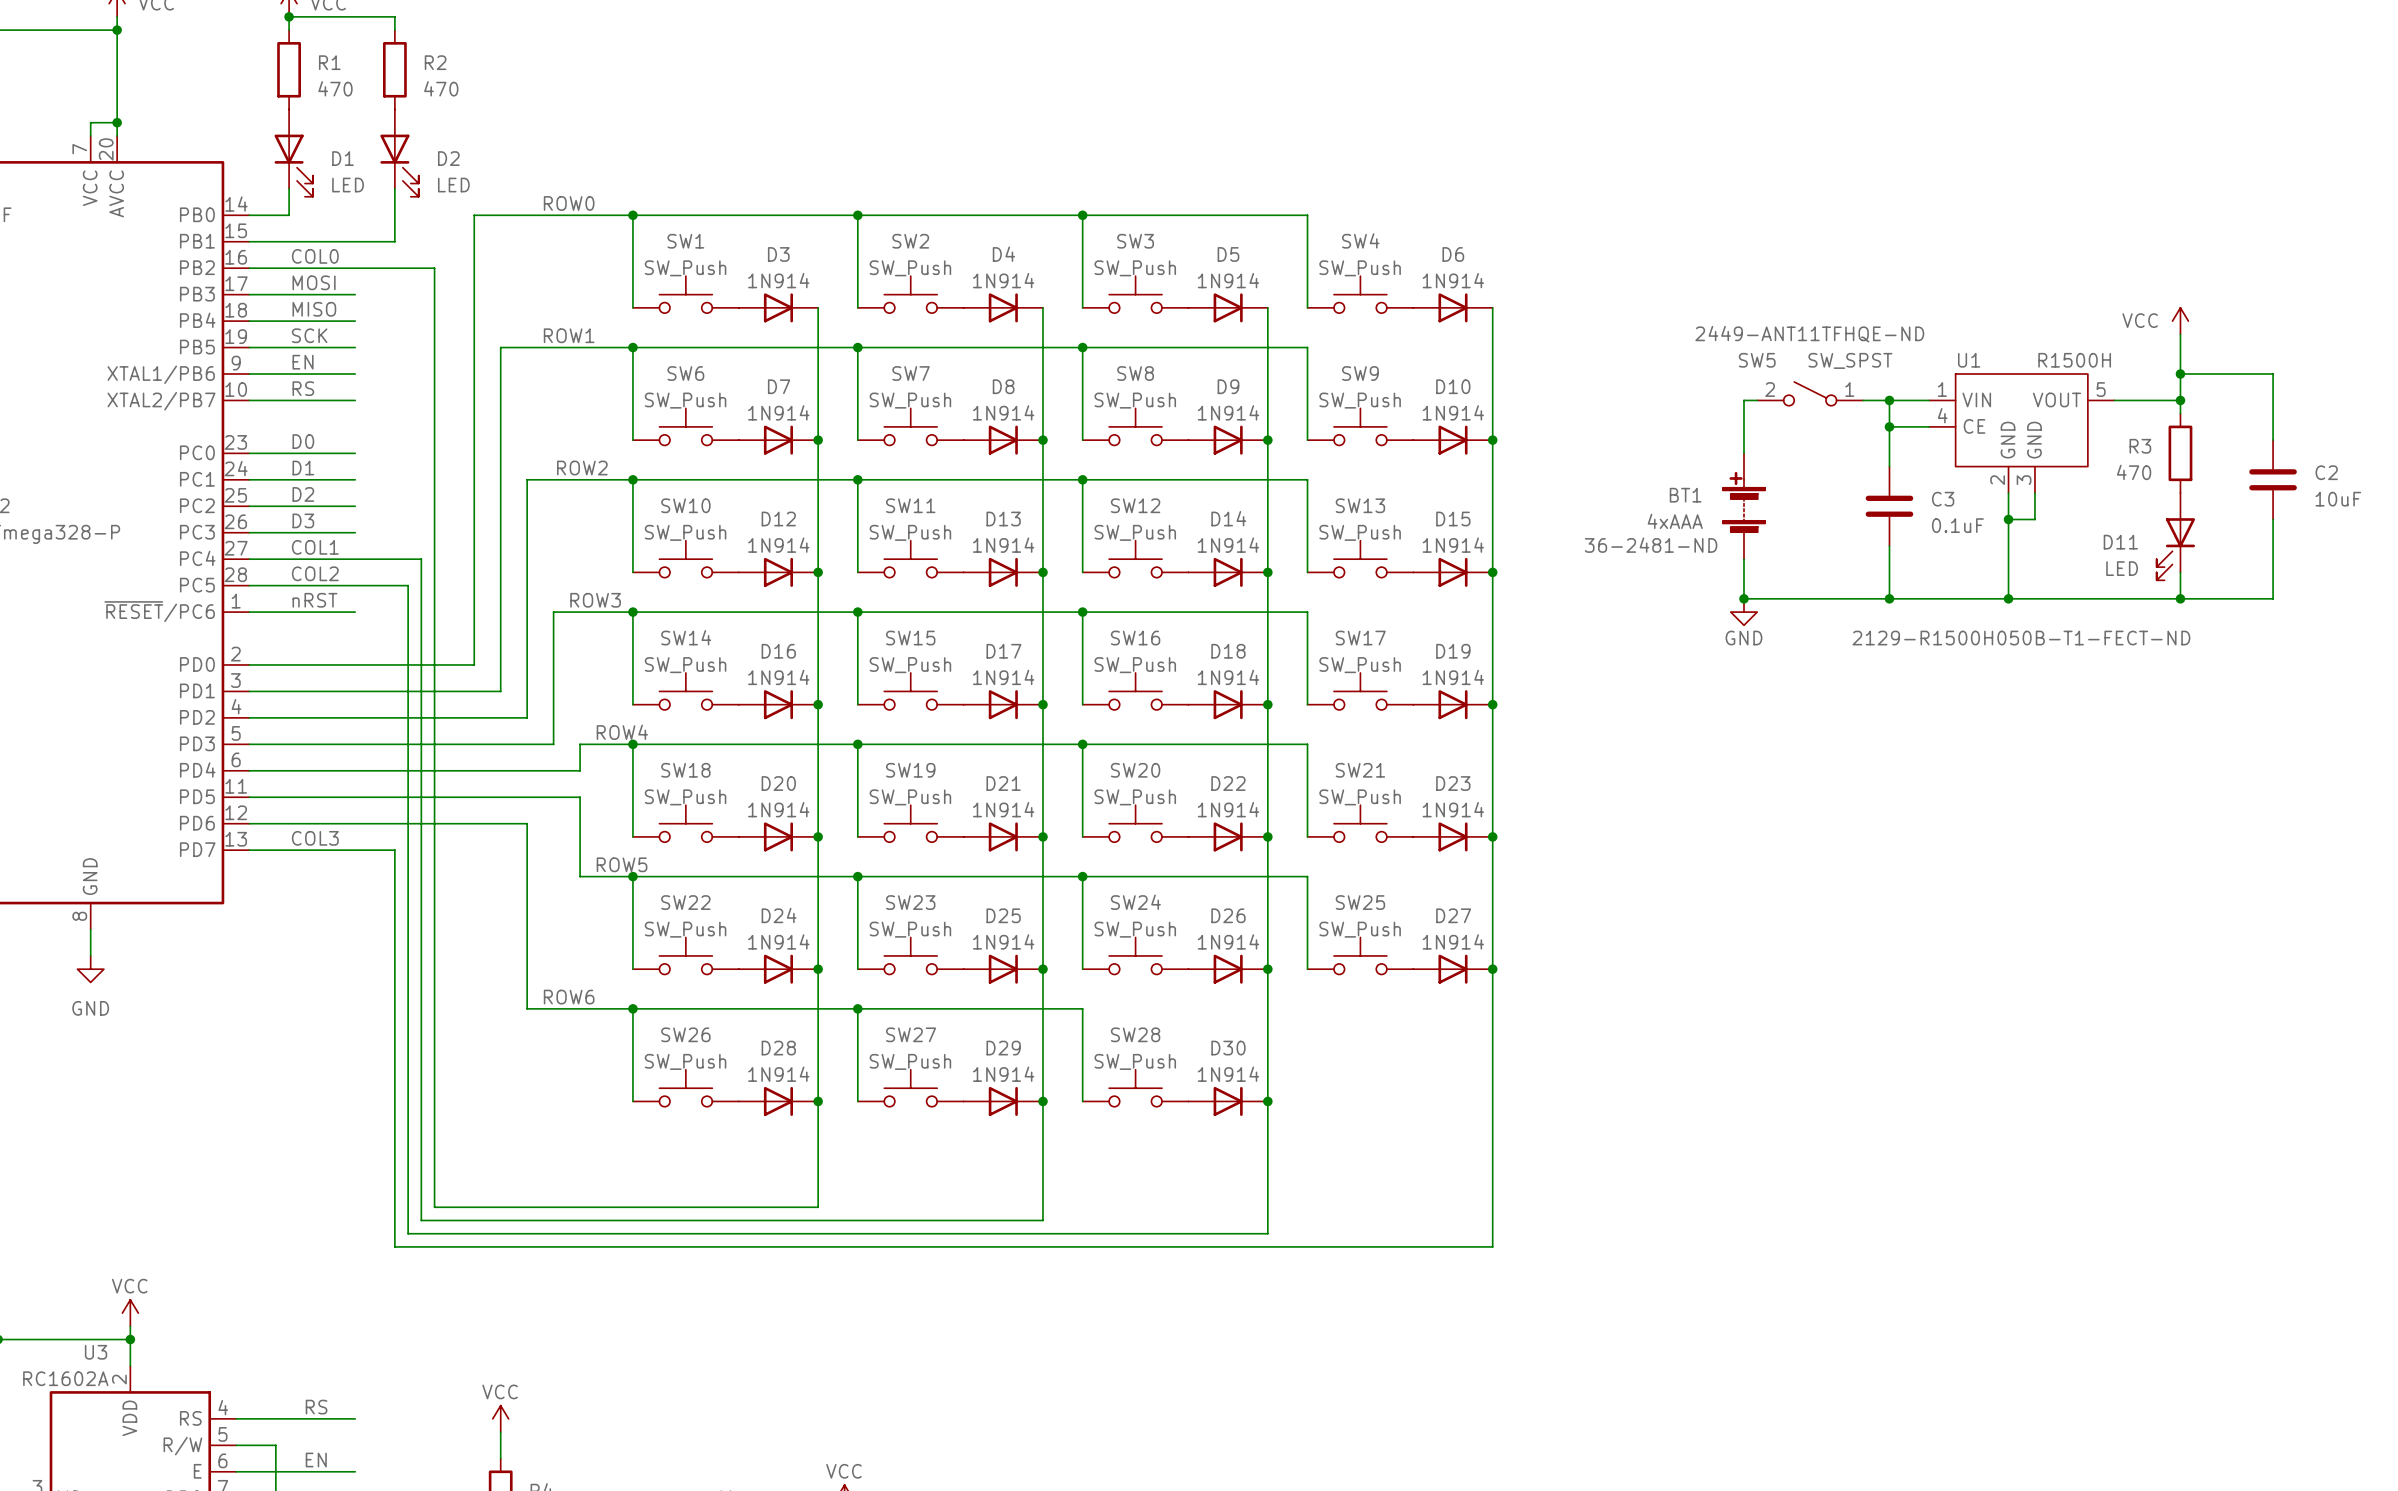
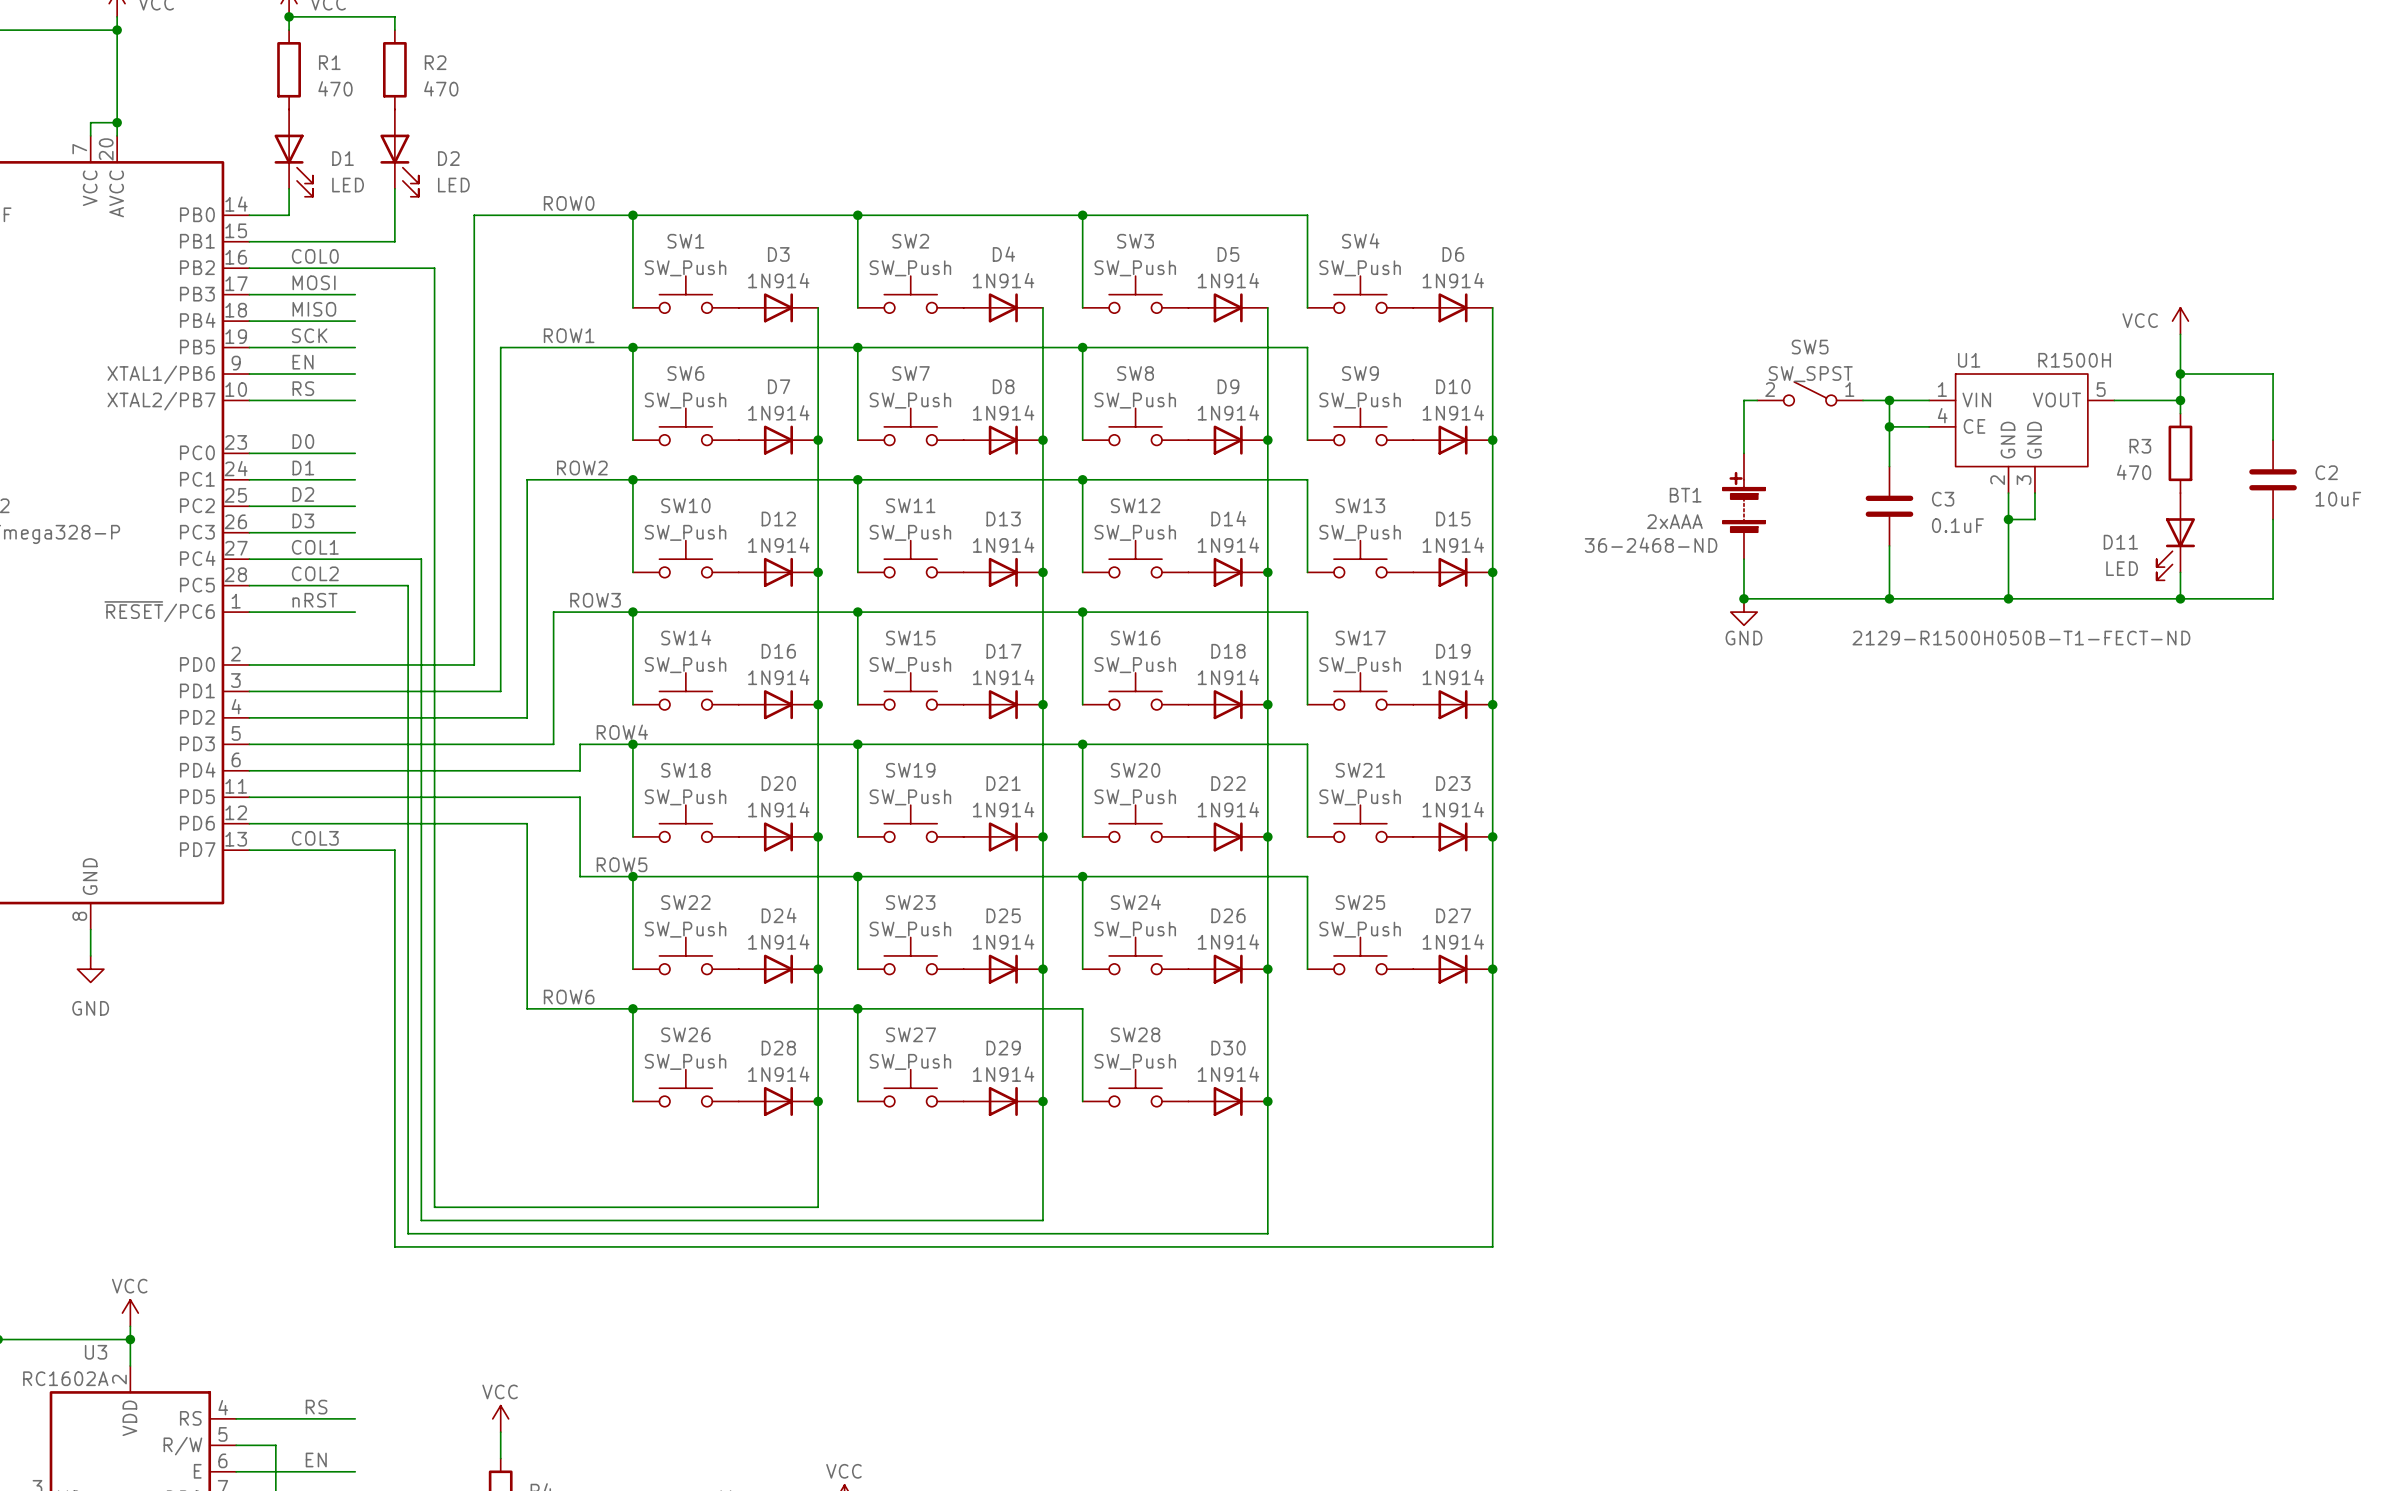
SW5 text: 2449-ANT11TFHQE-ND (1809, 334) -> none
SW5 name position: SW5 (1757, 360) -> SW5 (1810, 347)
SW5 value position: SW_SPST (1850, 360) -> SW_SPST (1810, 374)
BT1 value: 4xAAA (1675, 521) -> 2xAAA (1674, 521)
BT1 text: 36-2481-ND (1651, 545) -> 36-2468-ND (1651, 545)

